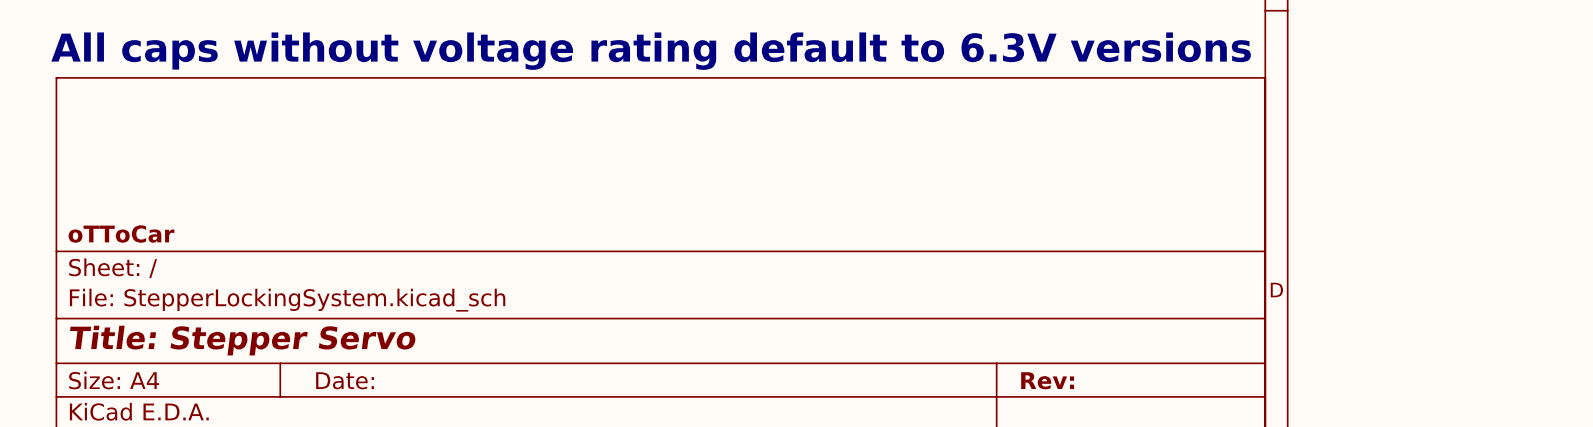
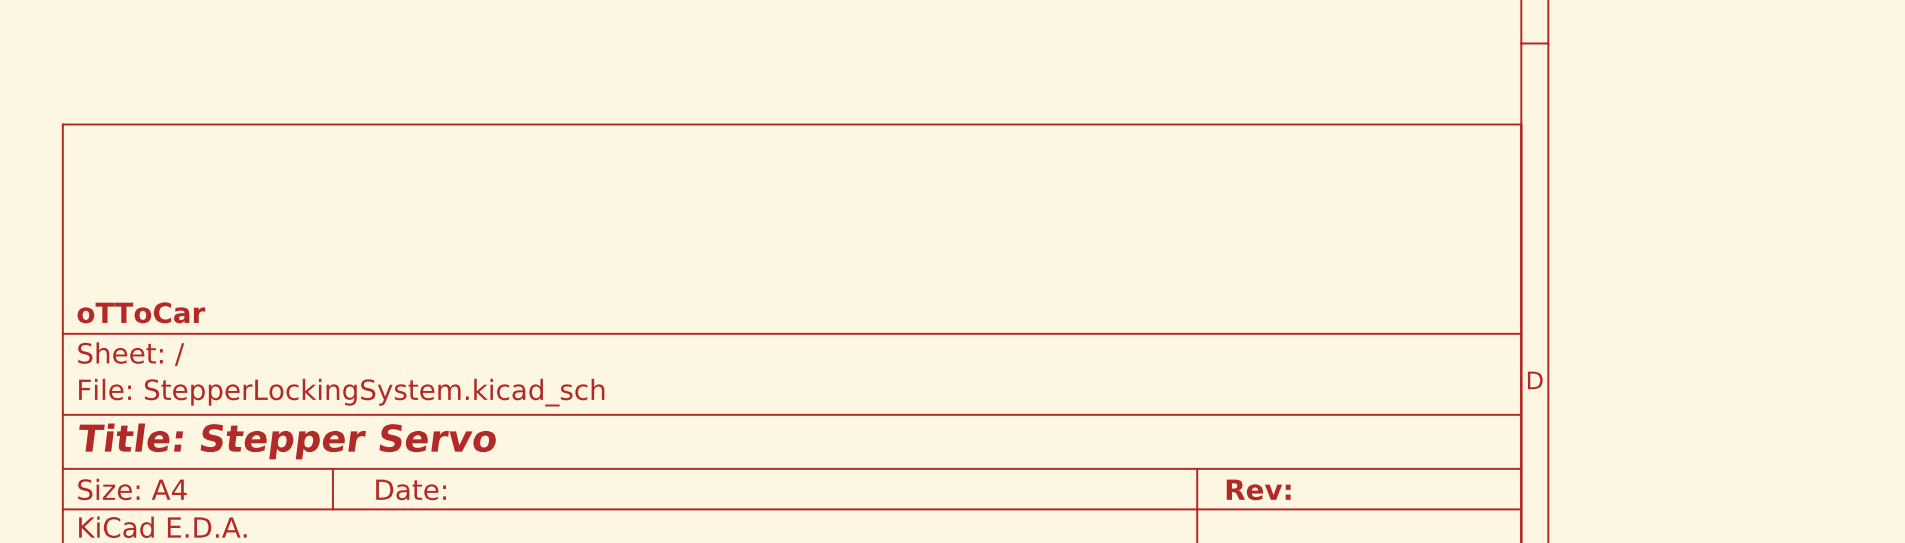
text: All caps without voltage rating default to 6.3V versions (651, 51) -> none

